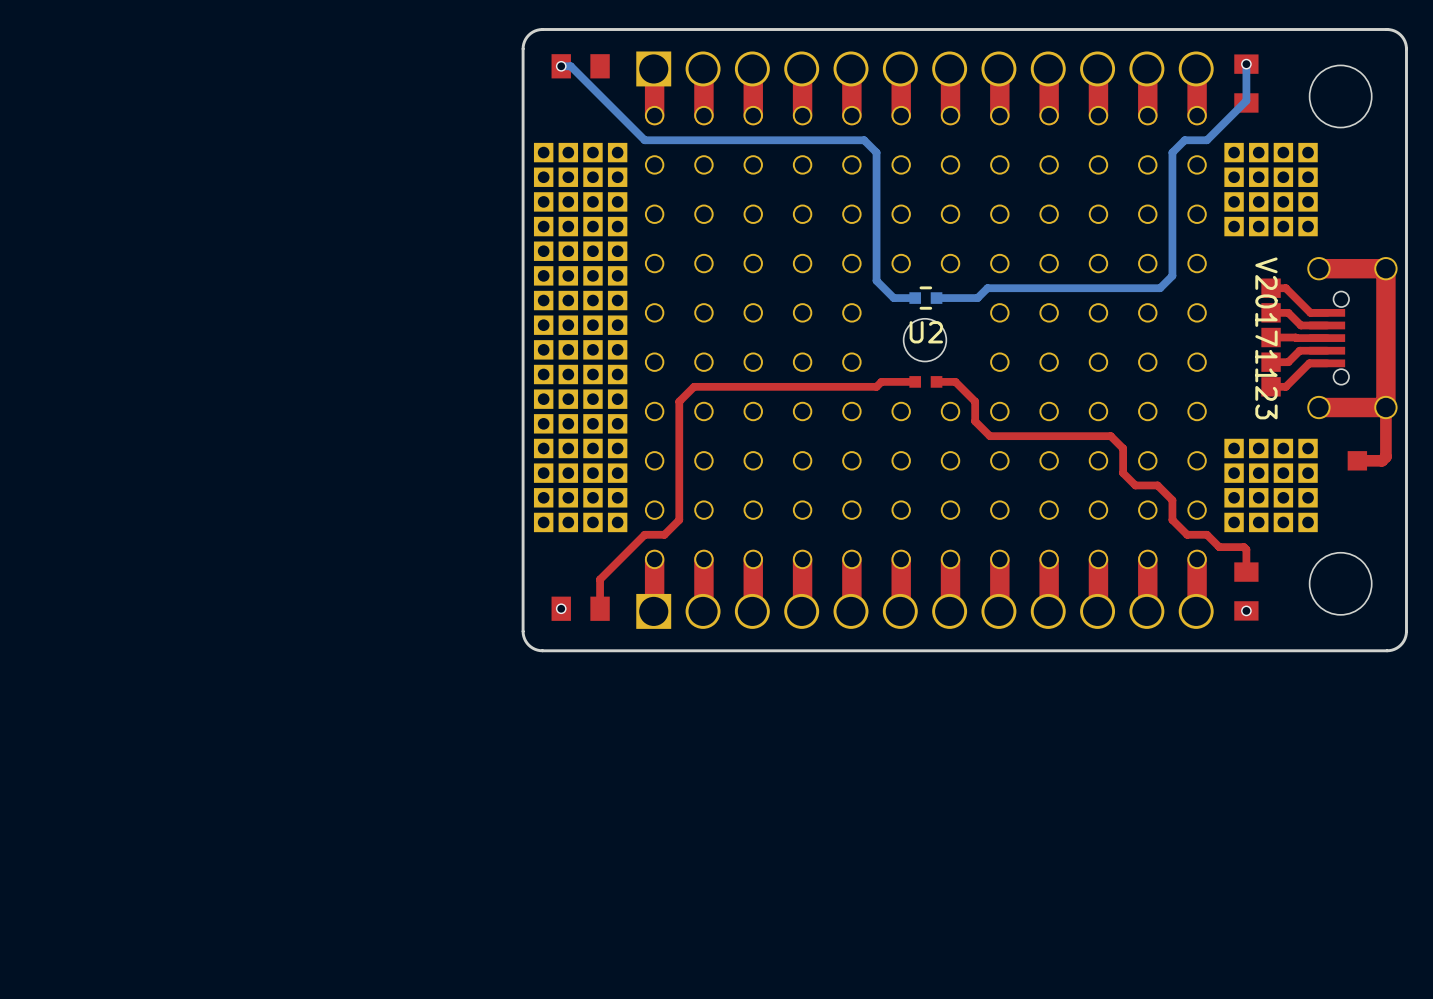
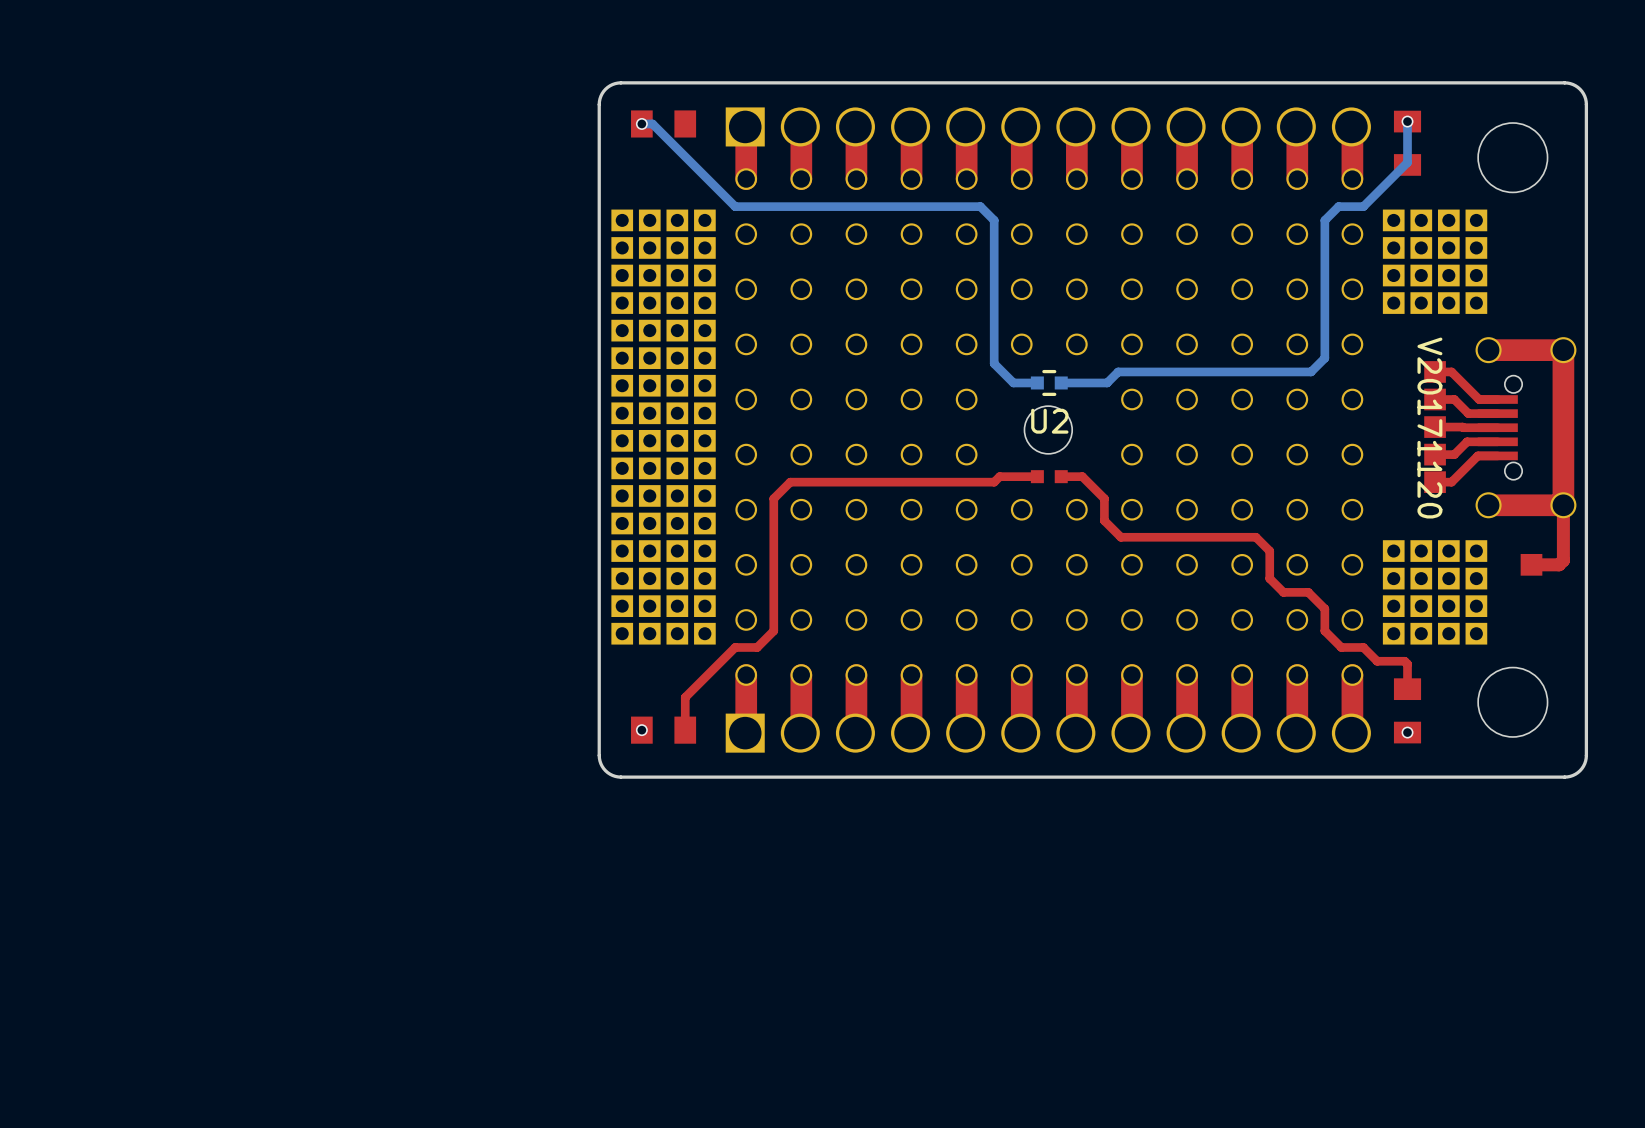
drawing shape: [1255, 257, 1278, 420] -> [1417, 337, 1443, 519]

